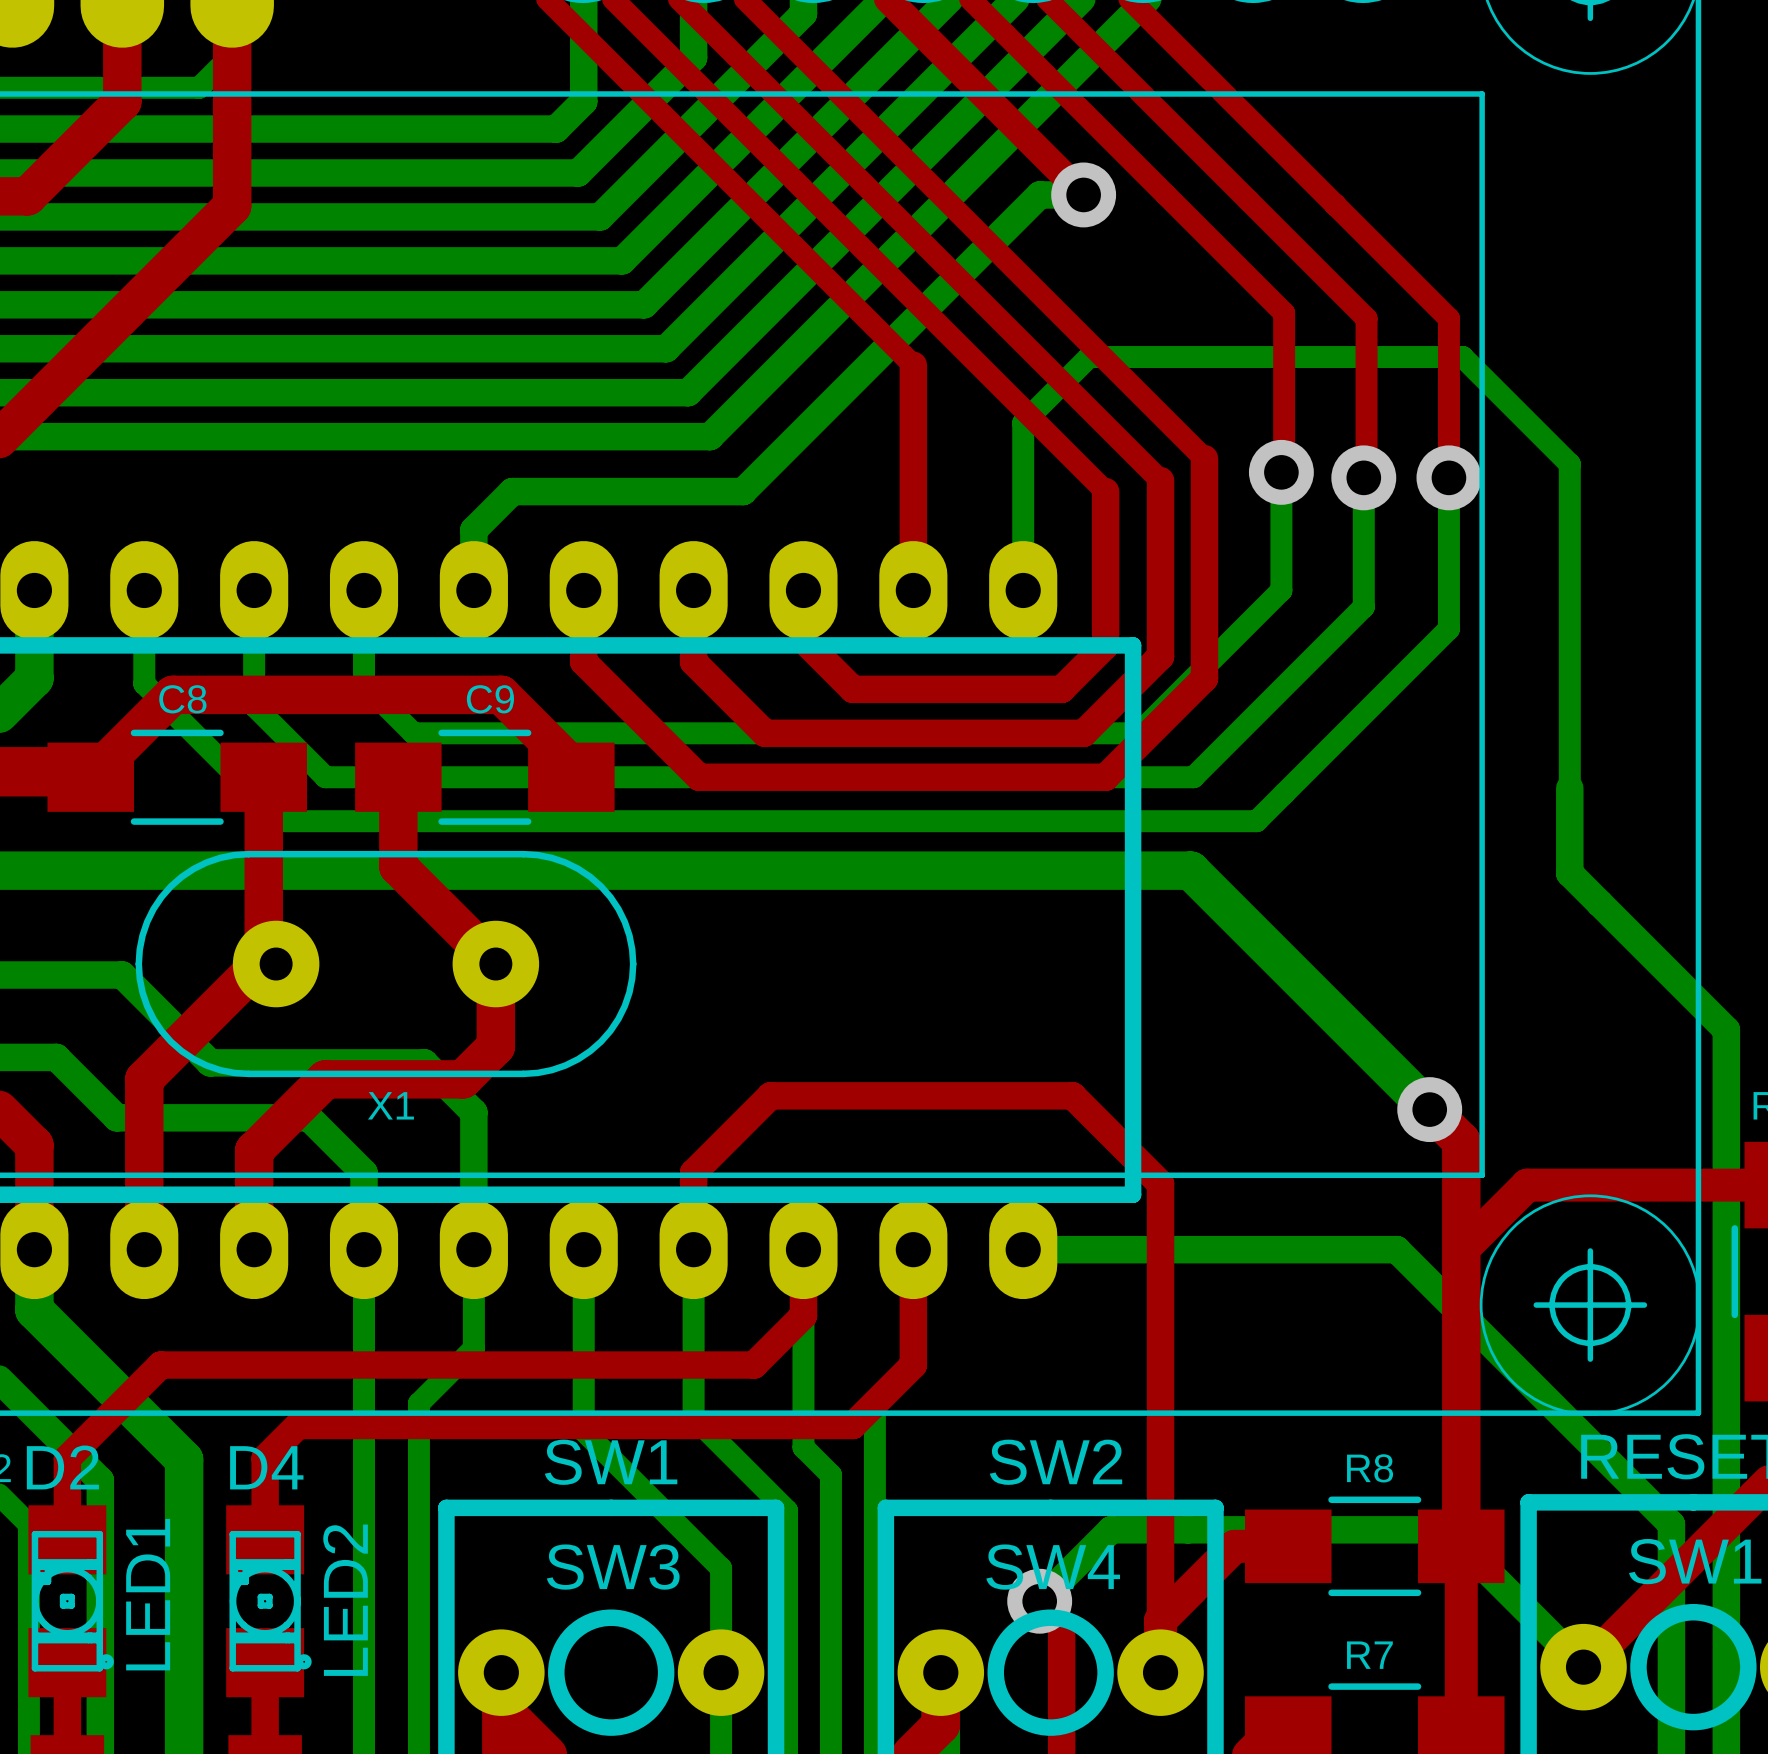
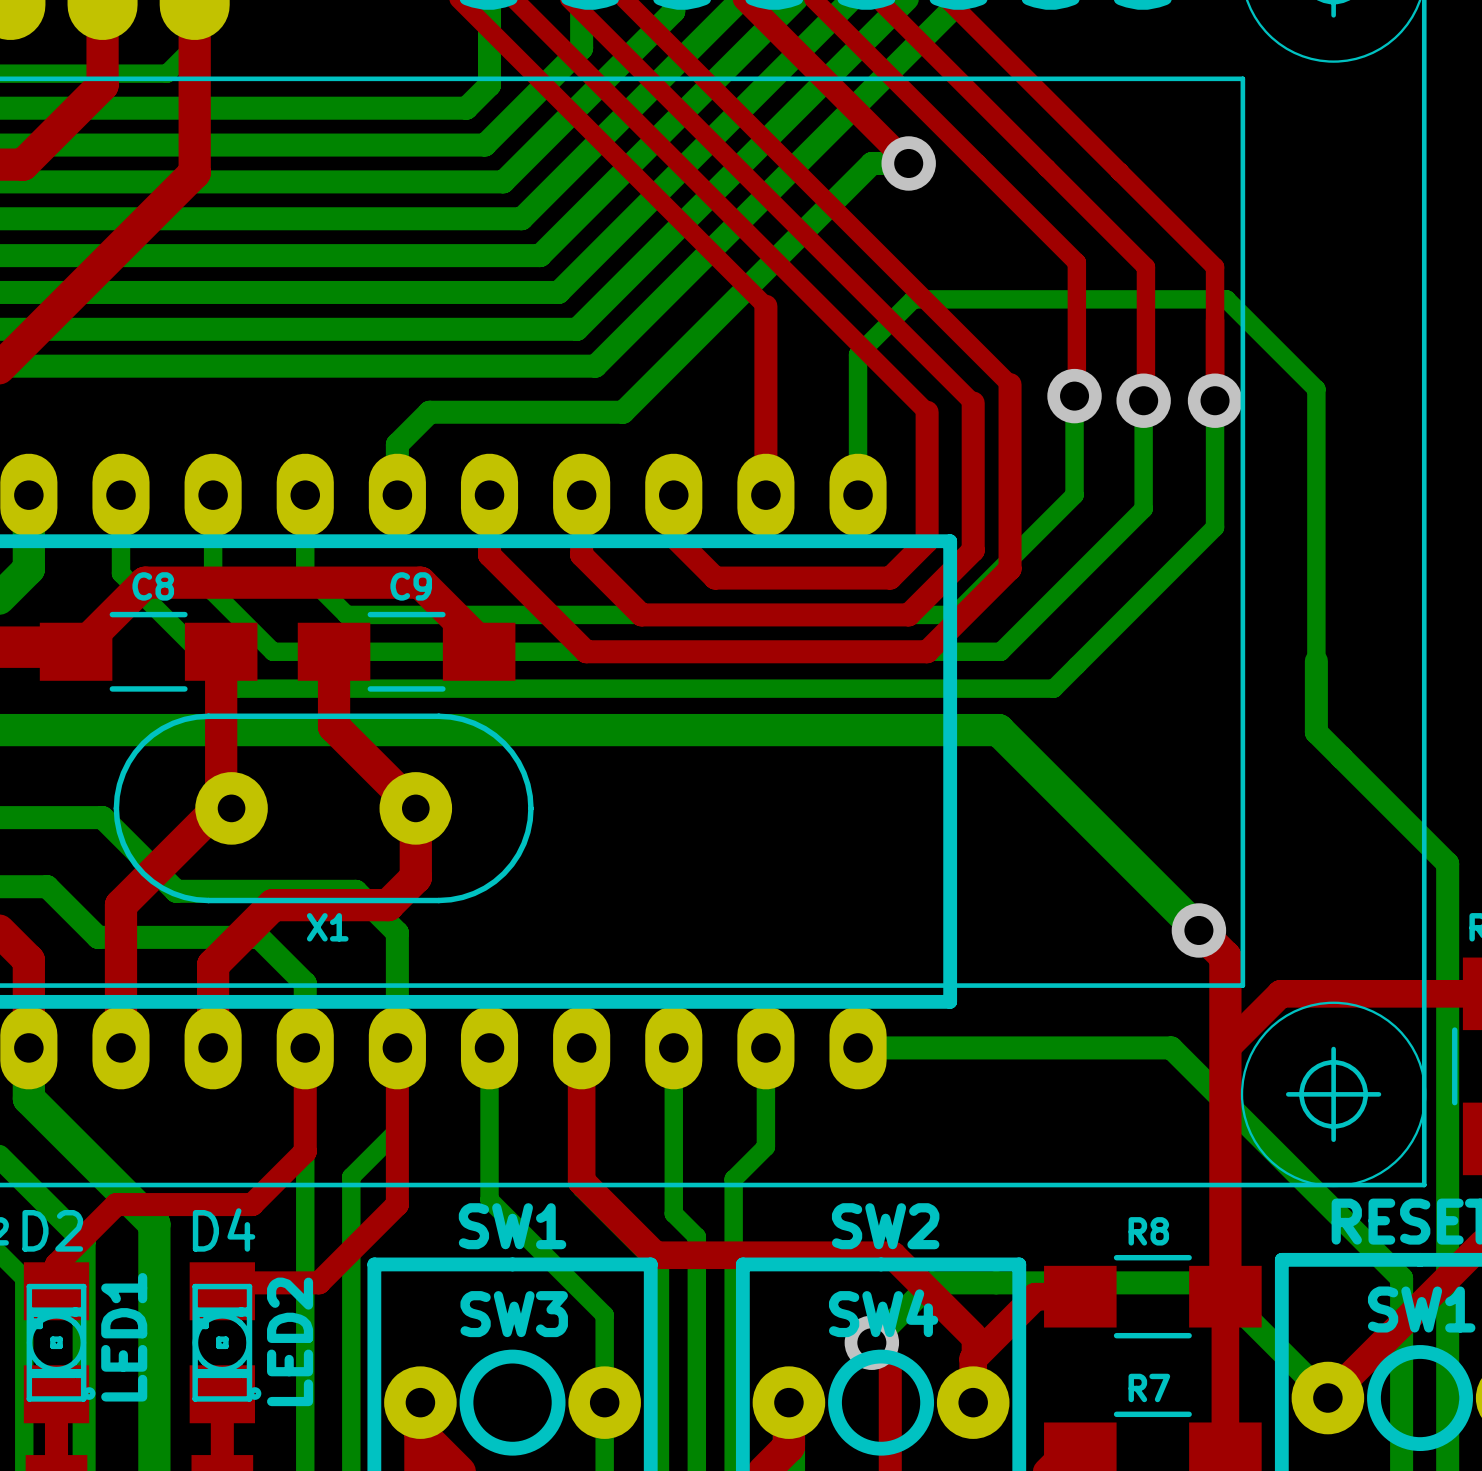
top track: none -> (397, 1047) (397, 1204) (319, 1282) (222, 1282)
top track: (693, 1249) (693, 1172) (770, 1095) (1072, 1095) (1160, 1183) (1160, 1593) -> (581, 1047) (581, 1181) (655, 1255) (892, 1255) (973, 1335)
top track: (803, 1249) (803, 1315) (754, 1365) (160, 1365) (67, 1458) (67, 1507) -> (305, 1047) (305, 1151) (252, 1204) (116, 1204) (56, 1264)
top track: (913, 1249) (913, 1365) (852, 1425) (298, 1425) (265, 1458) (265, 1539) -> none

